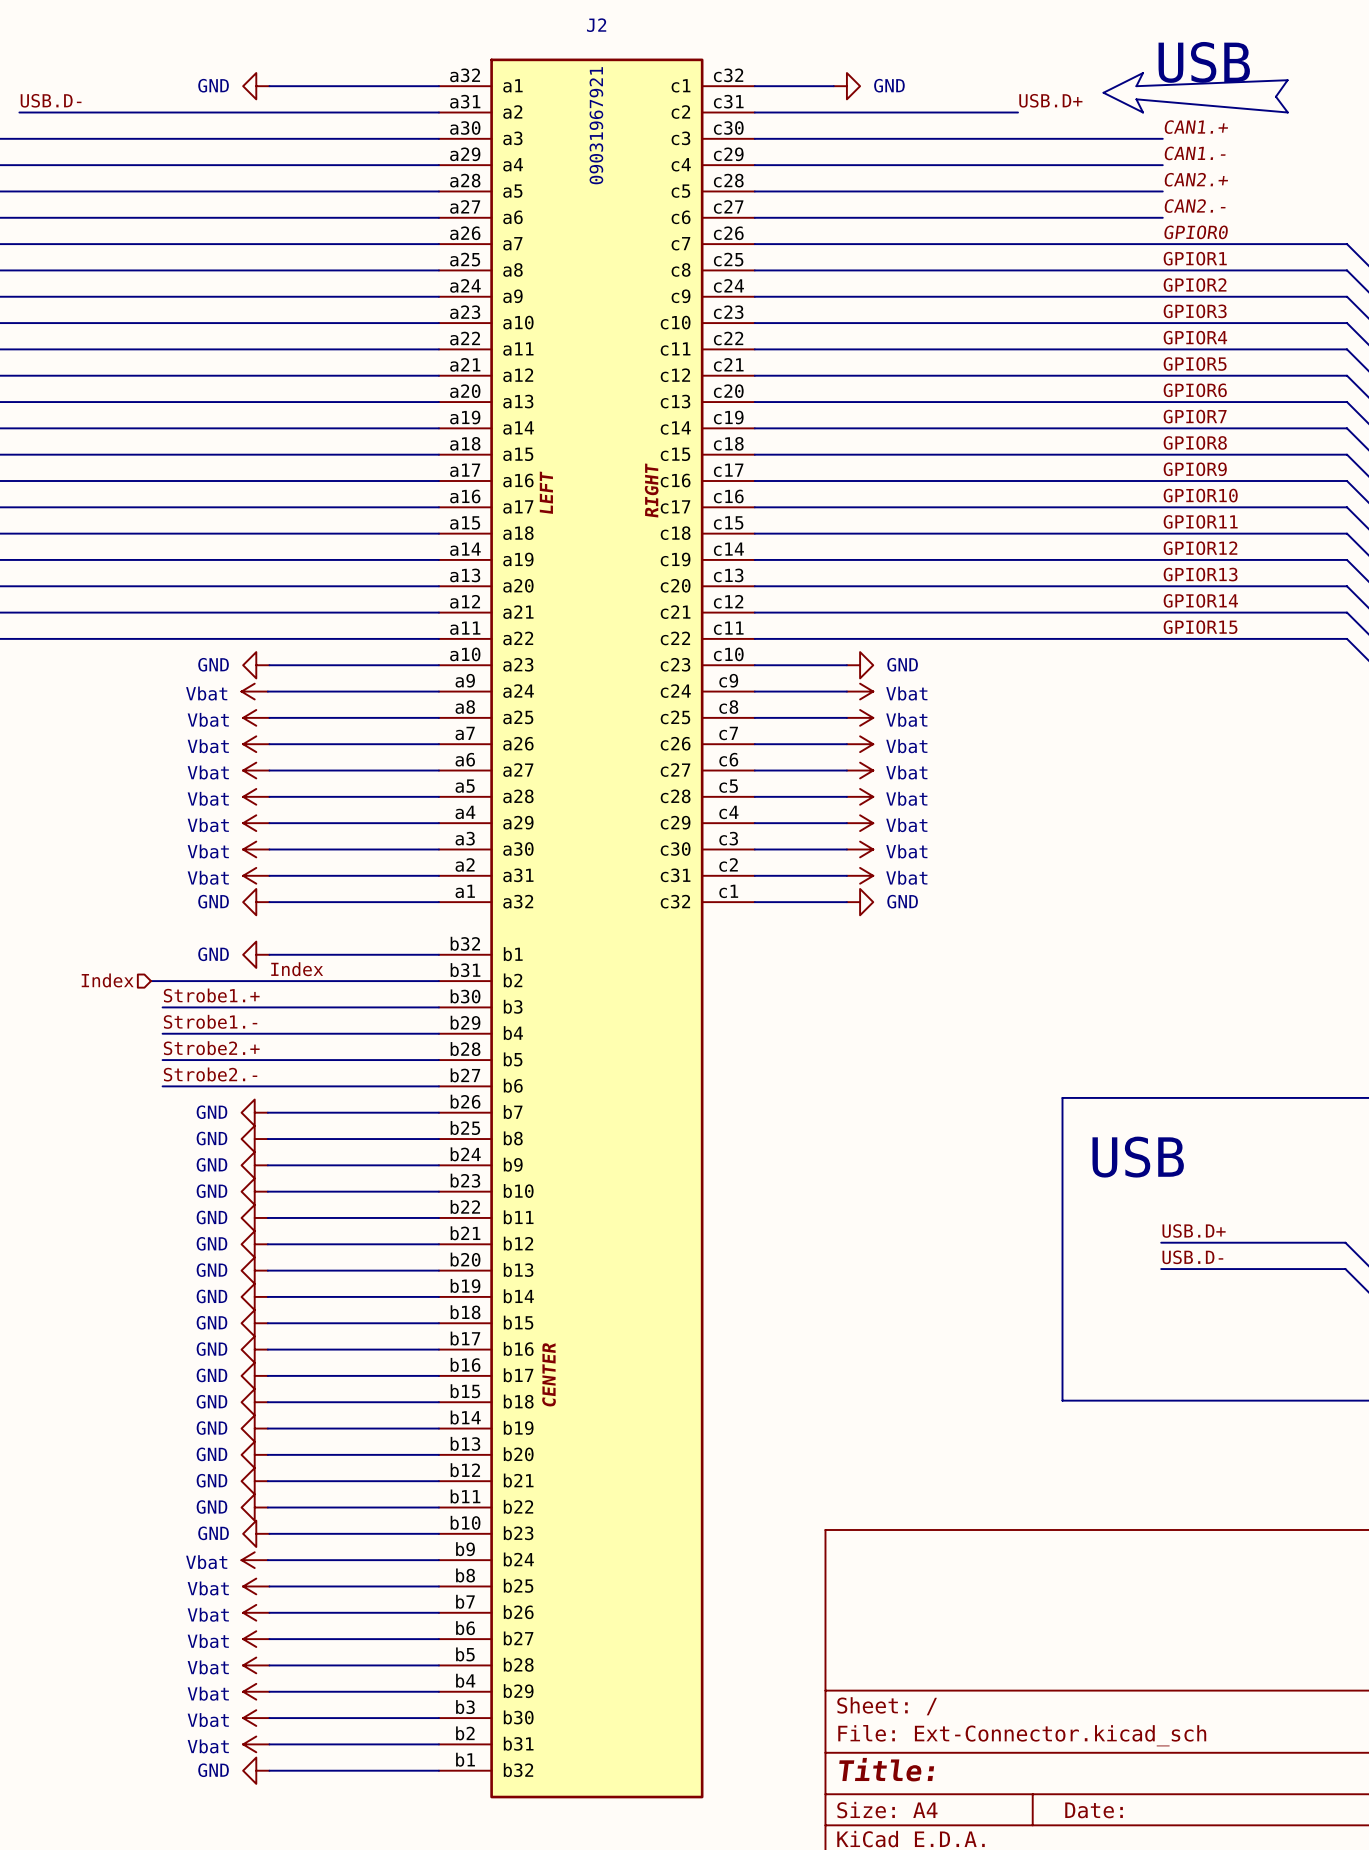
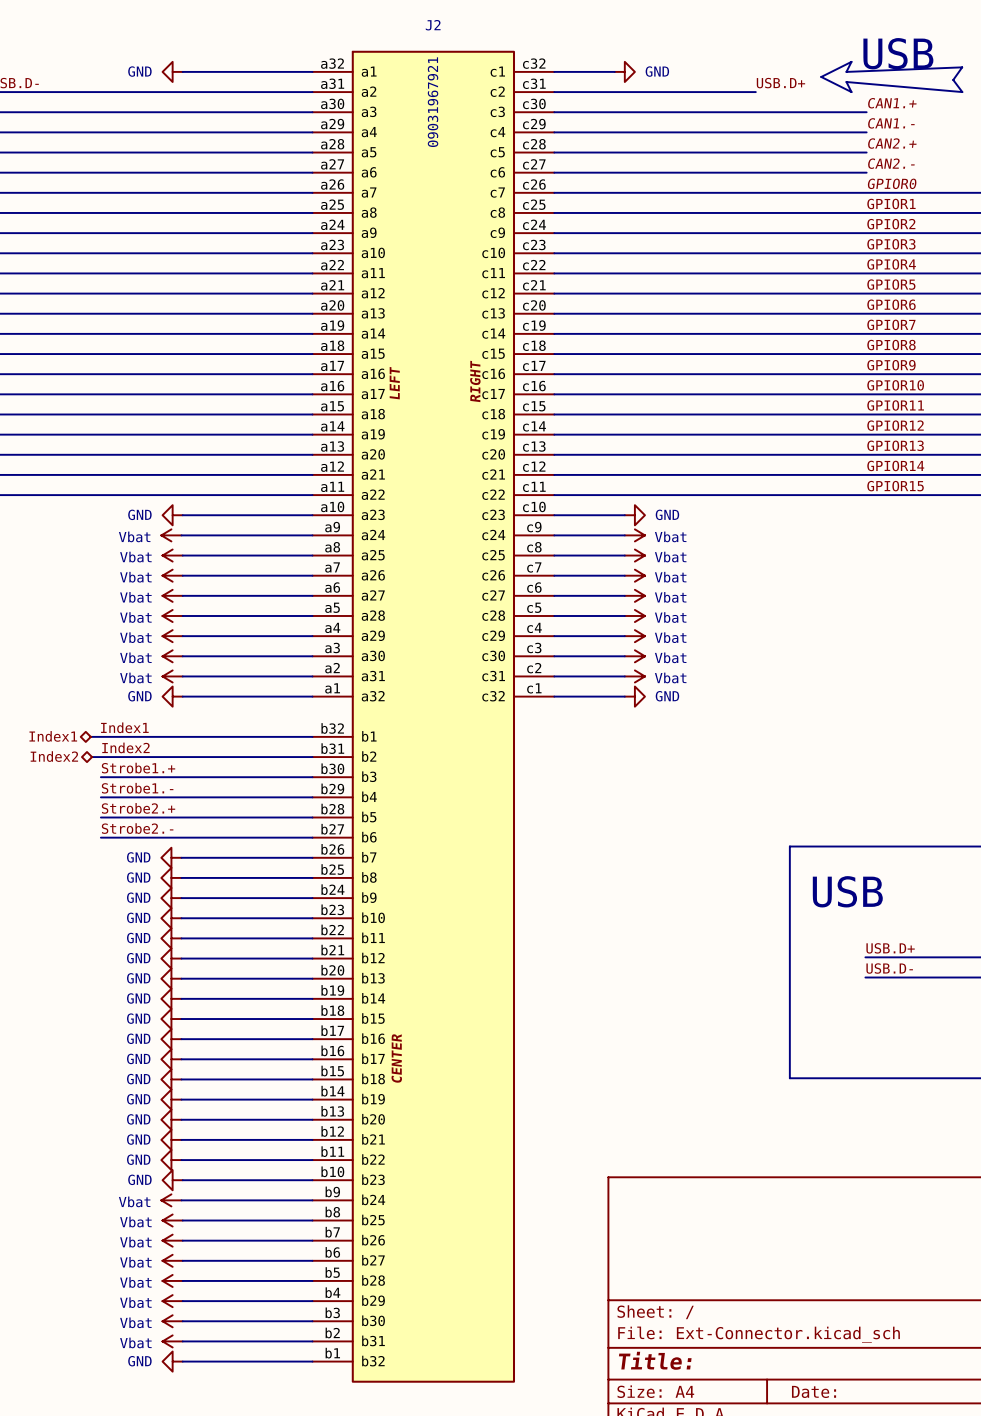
label: none -> Index1 (124, 727)
hierarchical label: none -> Index1 (53, 736)
wire: none -> (90, 736) (182, 736)
power symbol: GND (256, 954) -> none
label: none -> Index2 (125, 747)
label: Index (297, 969) -> none
hierarchical label shape: input (107, 980) -> bidirectional (54, 756)
hierarchical label: Index (107, 980) -> Index2 (54, 756)

